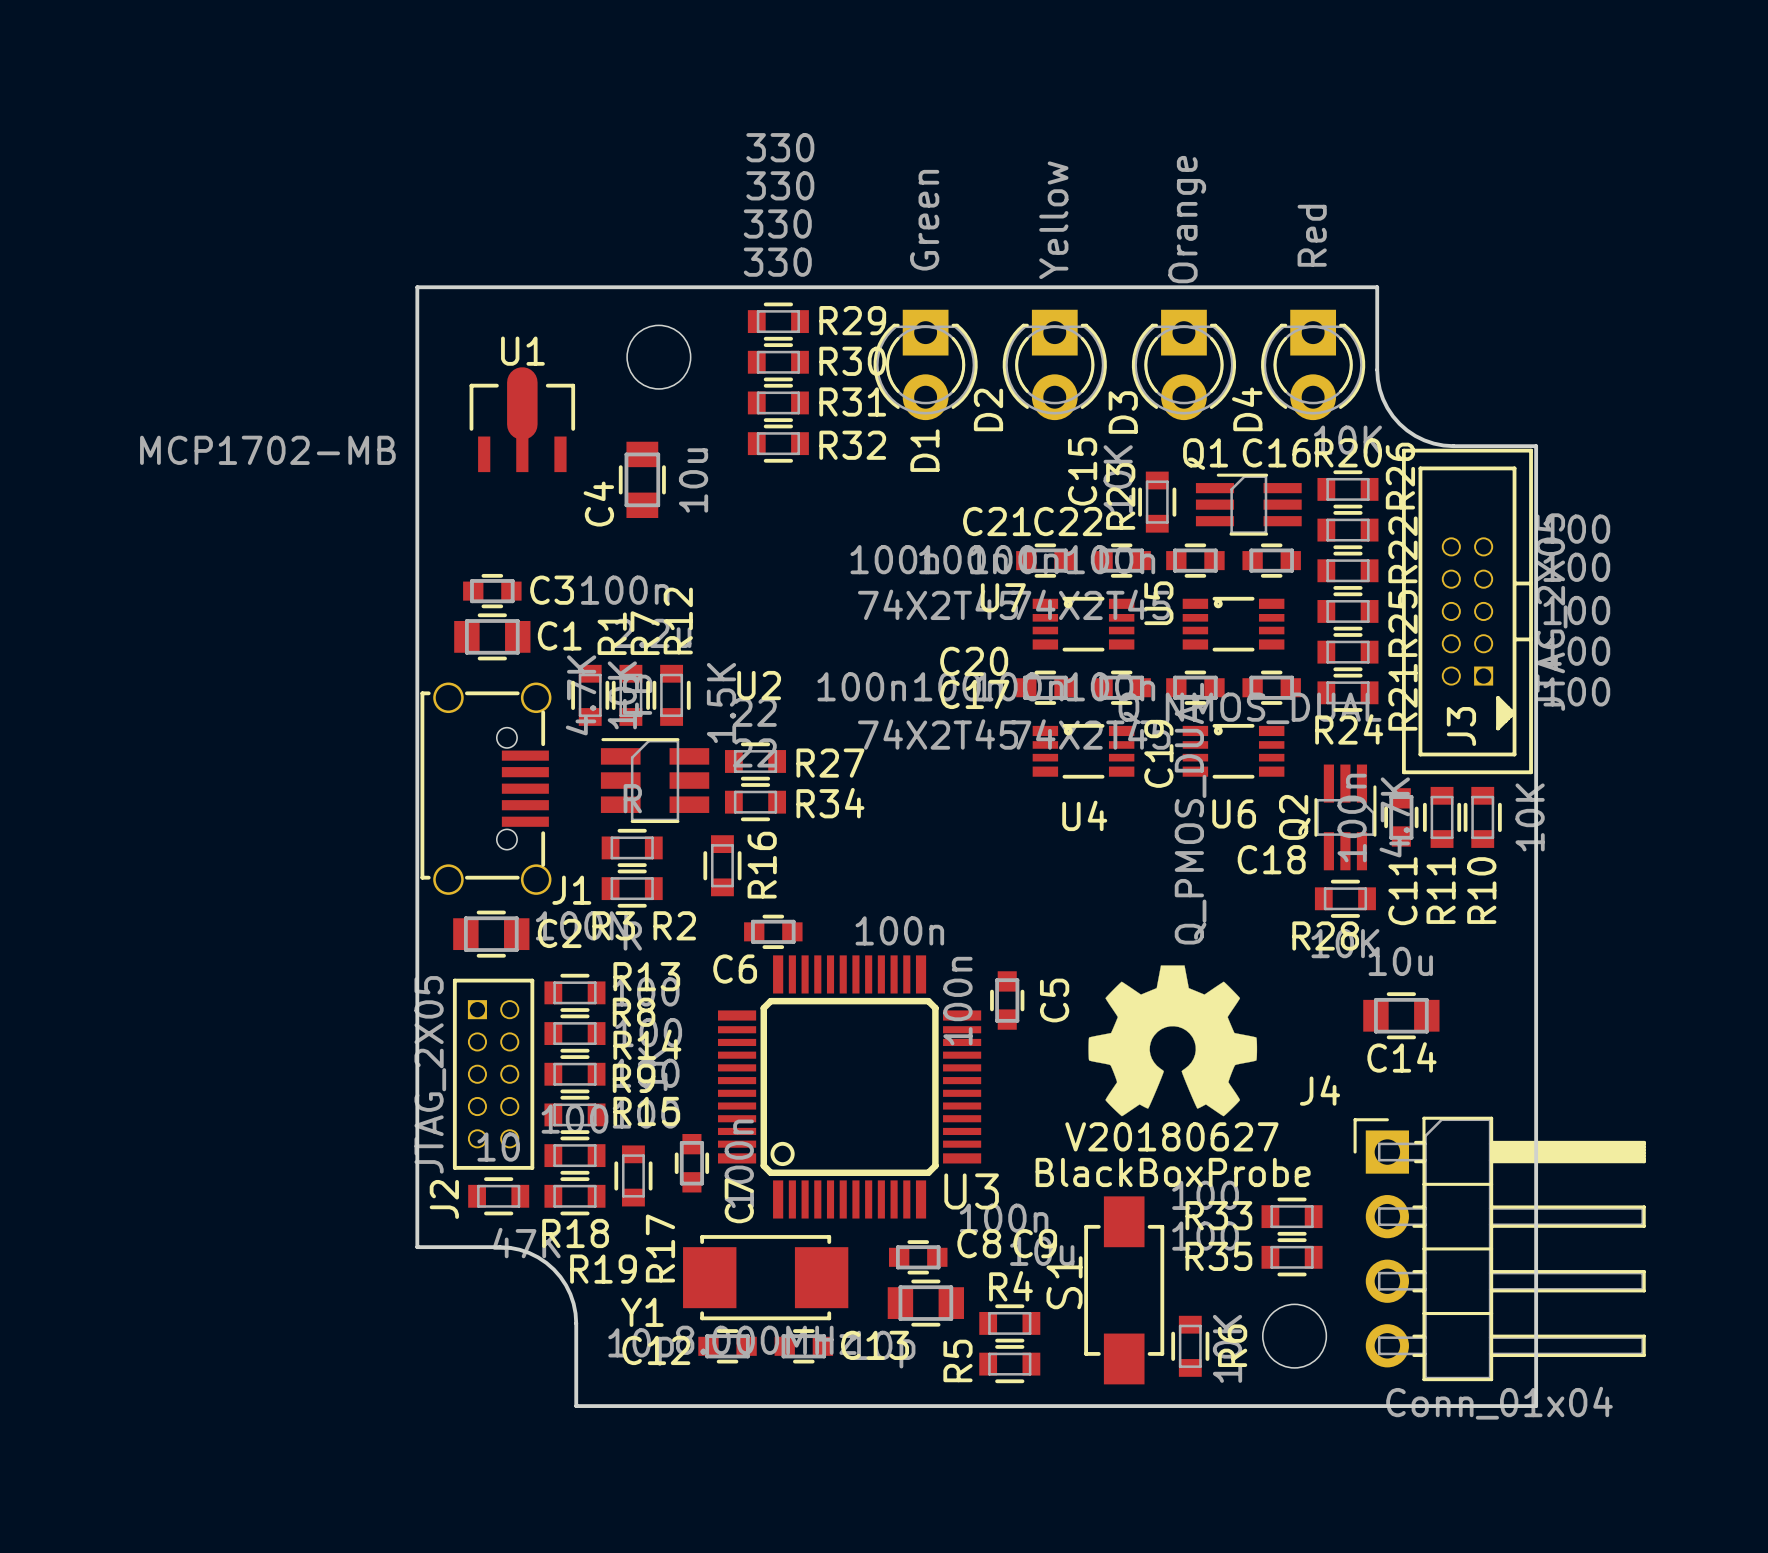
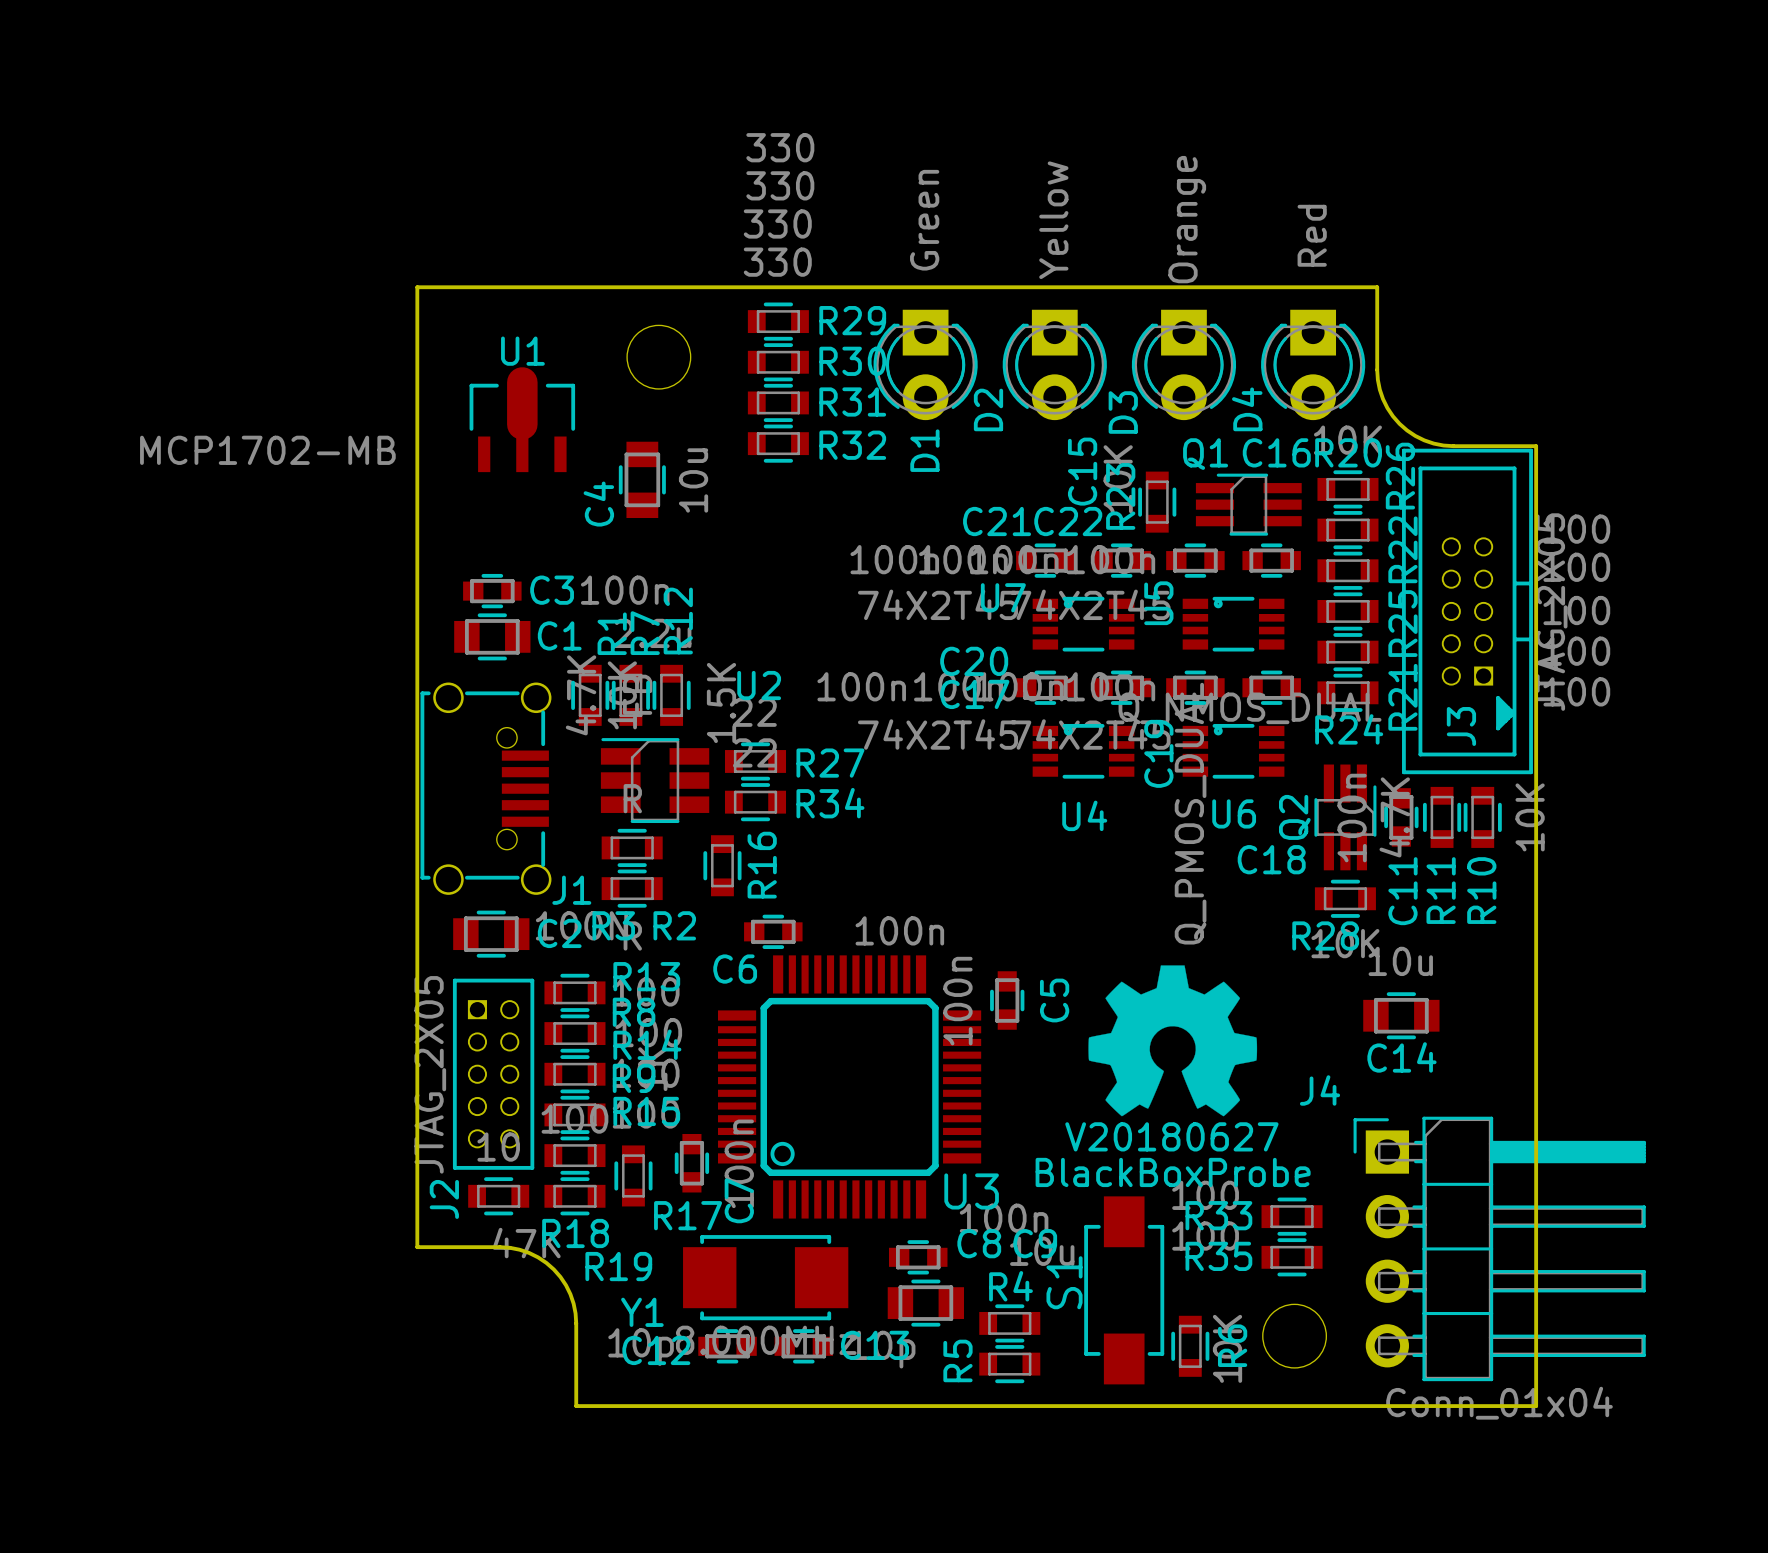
R17 name rotation: 0° (660, 1248) -> 90° clockwise (688, 1215)
R19 name position: R19 (603, 1269) -> R19 (618, 1266)

